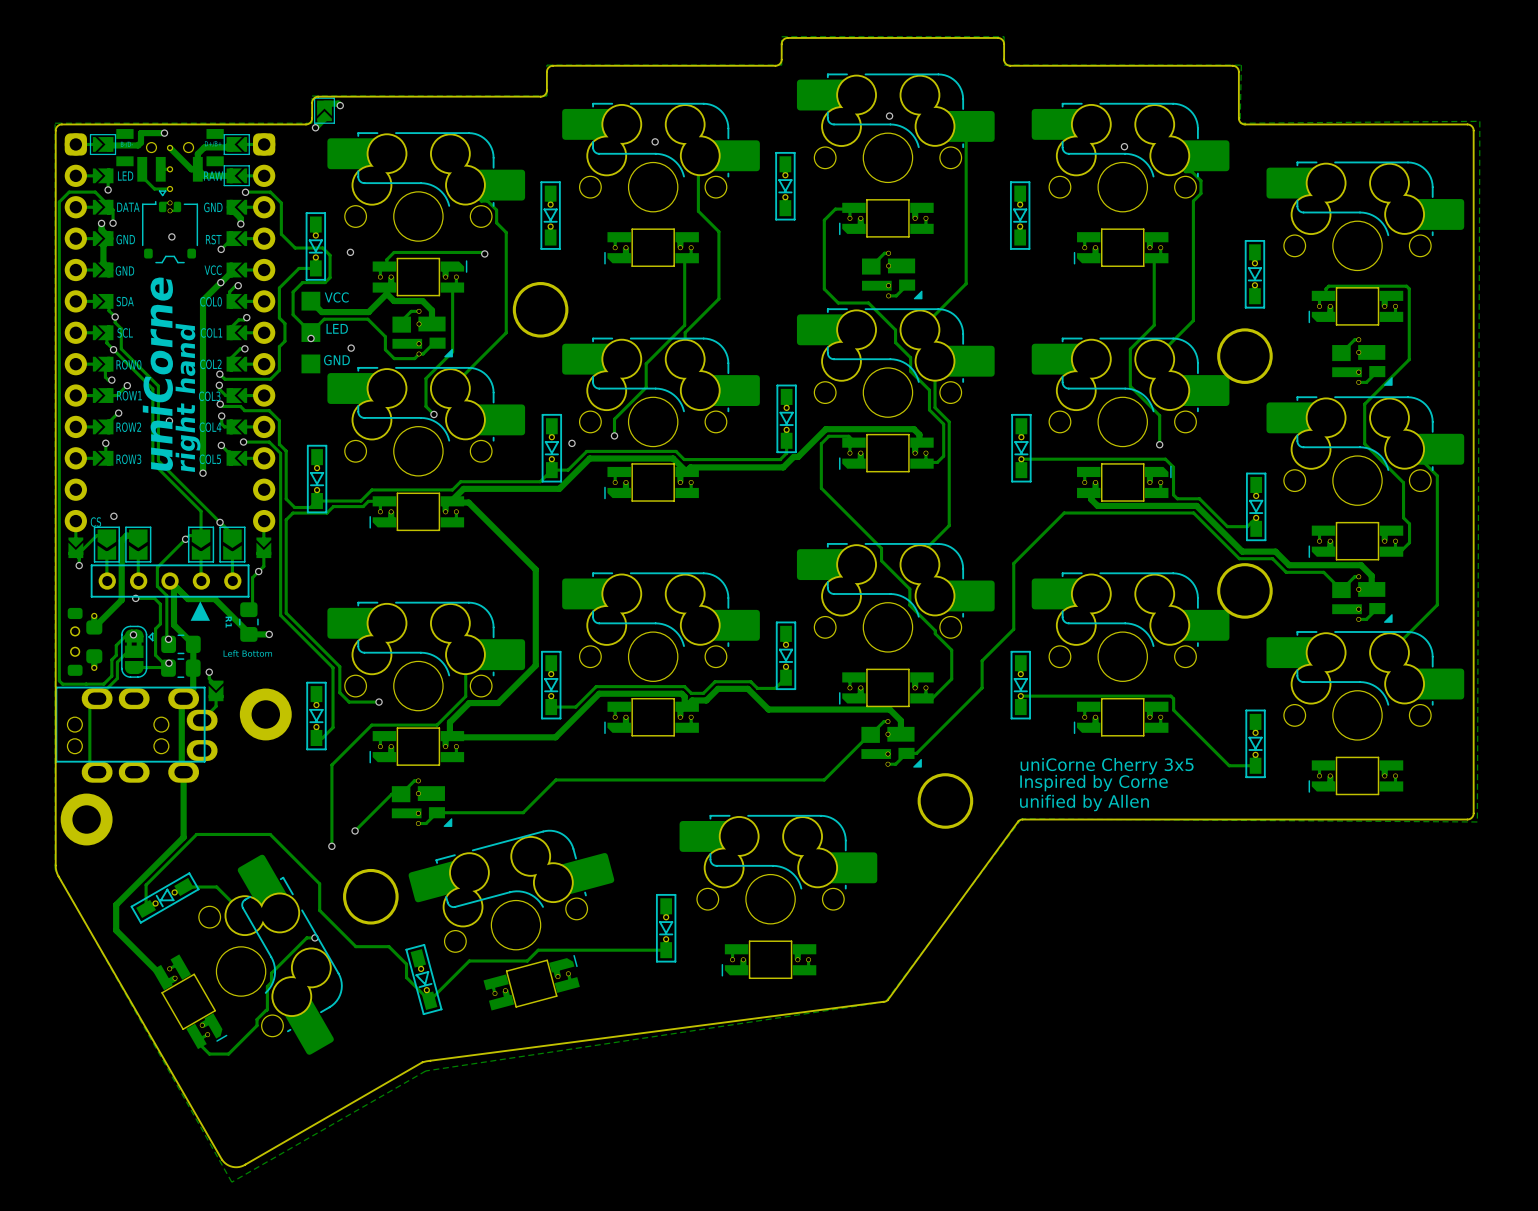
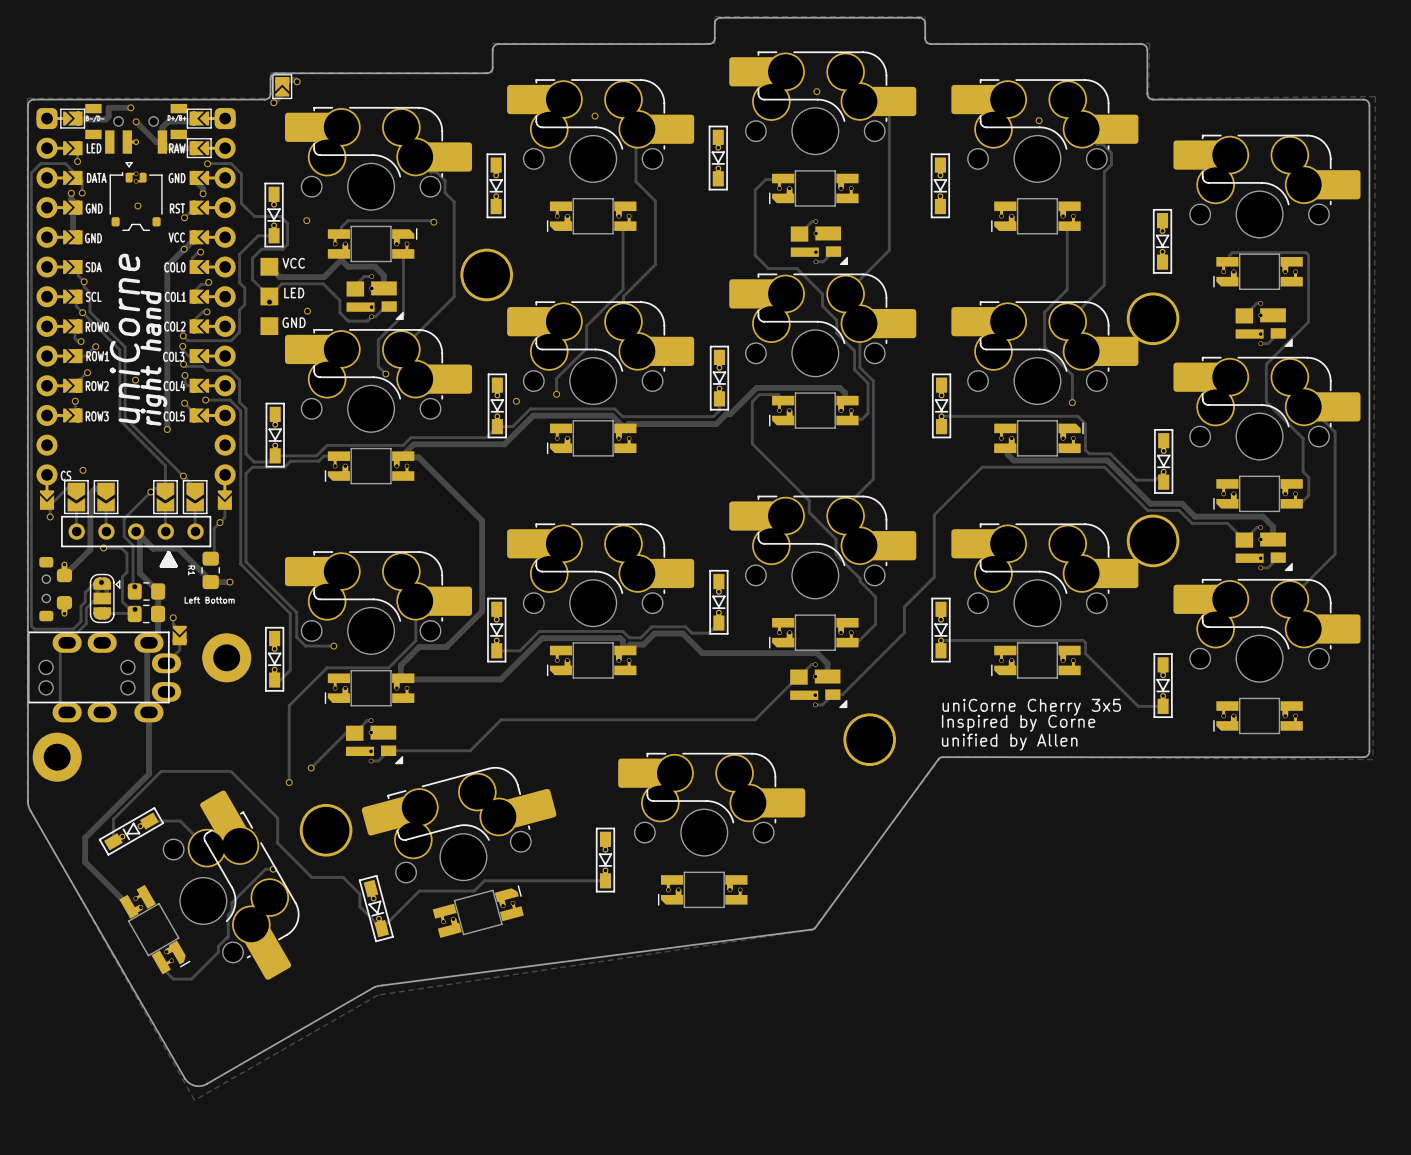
part footprint: [116, 129, 224, 193] -> [85, 103, 187, 154]
via: none -> (136, 121)
track: (142, 176) (154, 189) (170, 189) -> none

